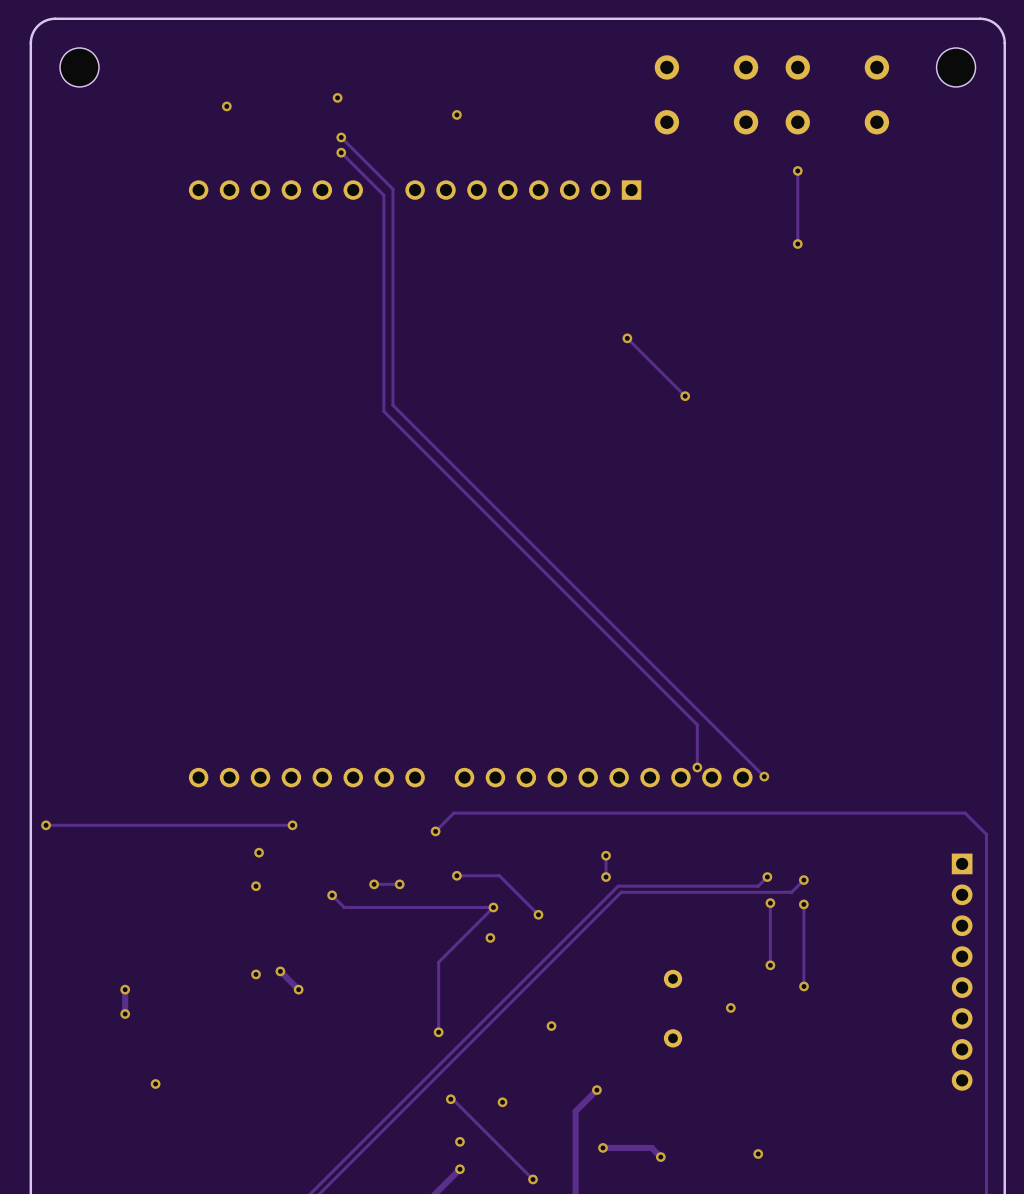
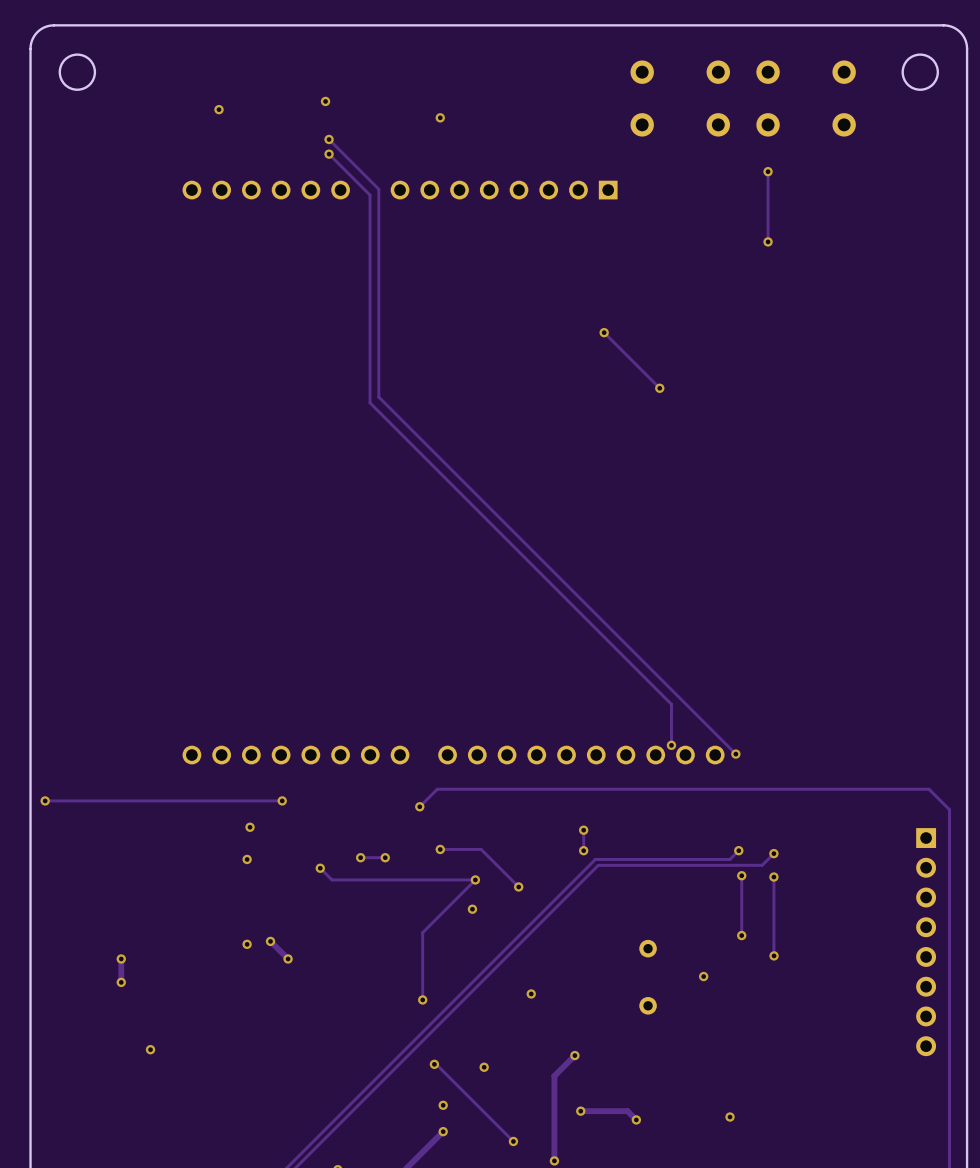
round board edge: none -> [58, 53, 97, 91]
round board edge: none -> [901, 53, 939, 91]
part: (79, 67) -> none
part: (956, 67) -> none

